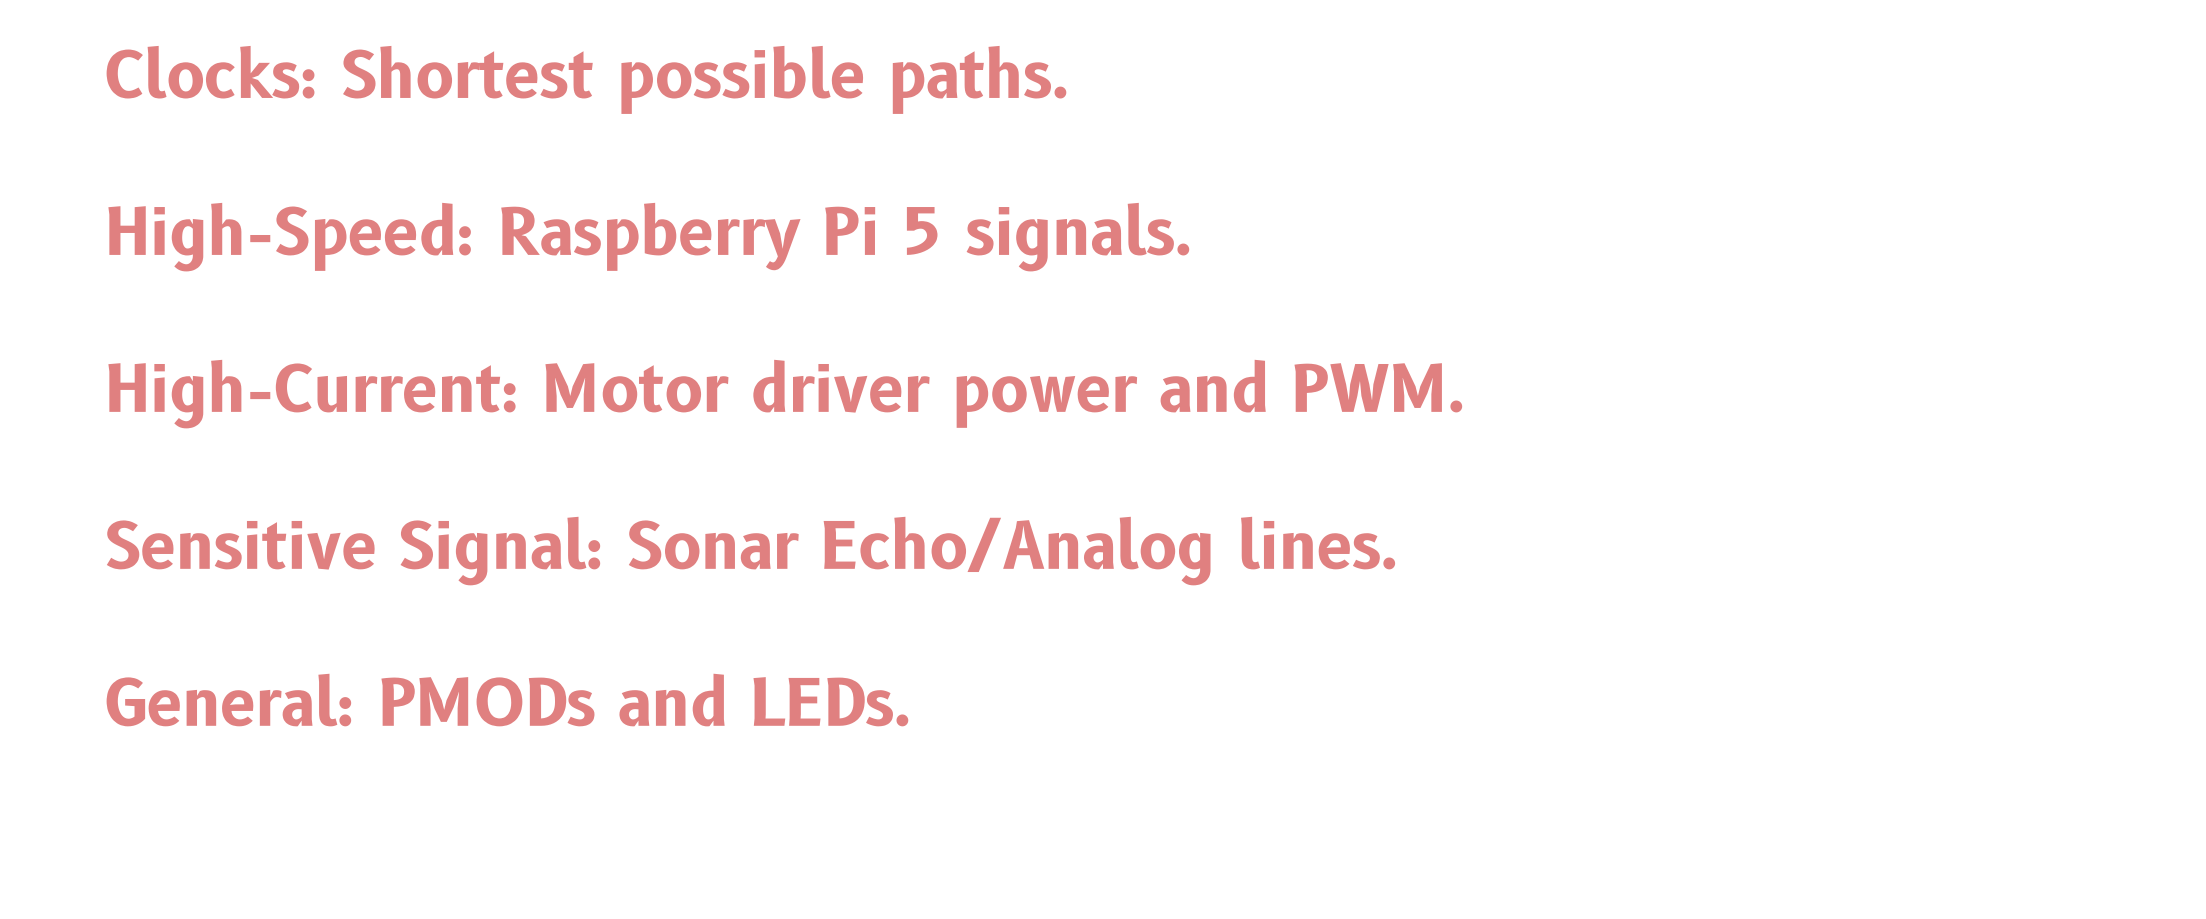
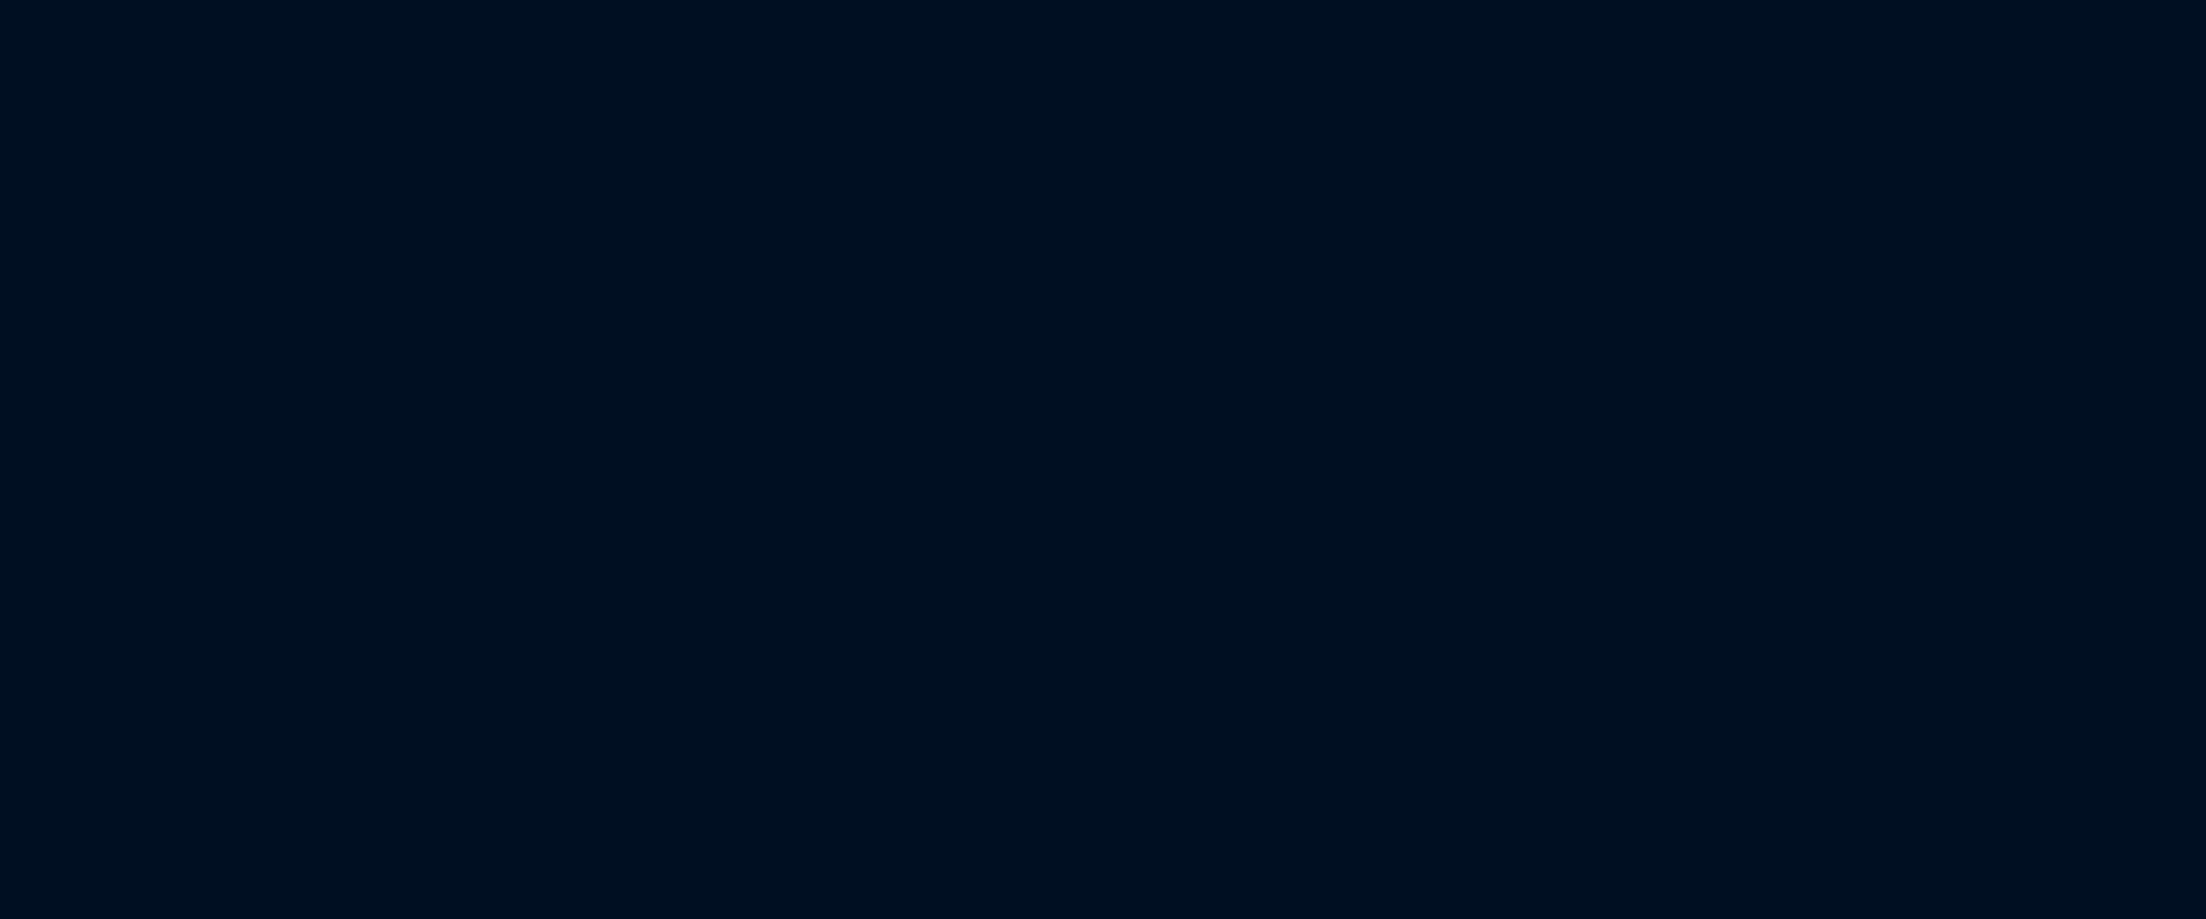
text: Clocks: Shortest possible paths. (586, 79) -> none
text: High-Speed: Raspberry Pi 5 signals. (648, 237) -> none
text: High-Current: Motor driver power and PWM. (785, 394) -> none
text: Sensitive Signal: Sonar Echo/Analog lines. (750, 551) -> none
text: General: PMODs and LEDs. (507, 700) -> none

